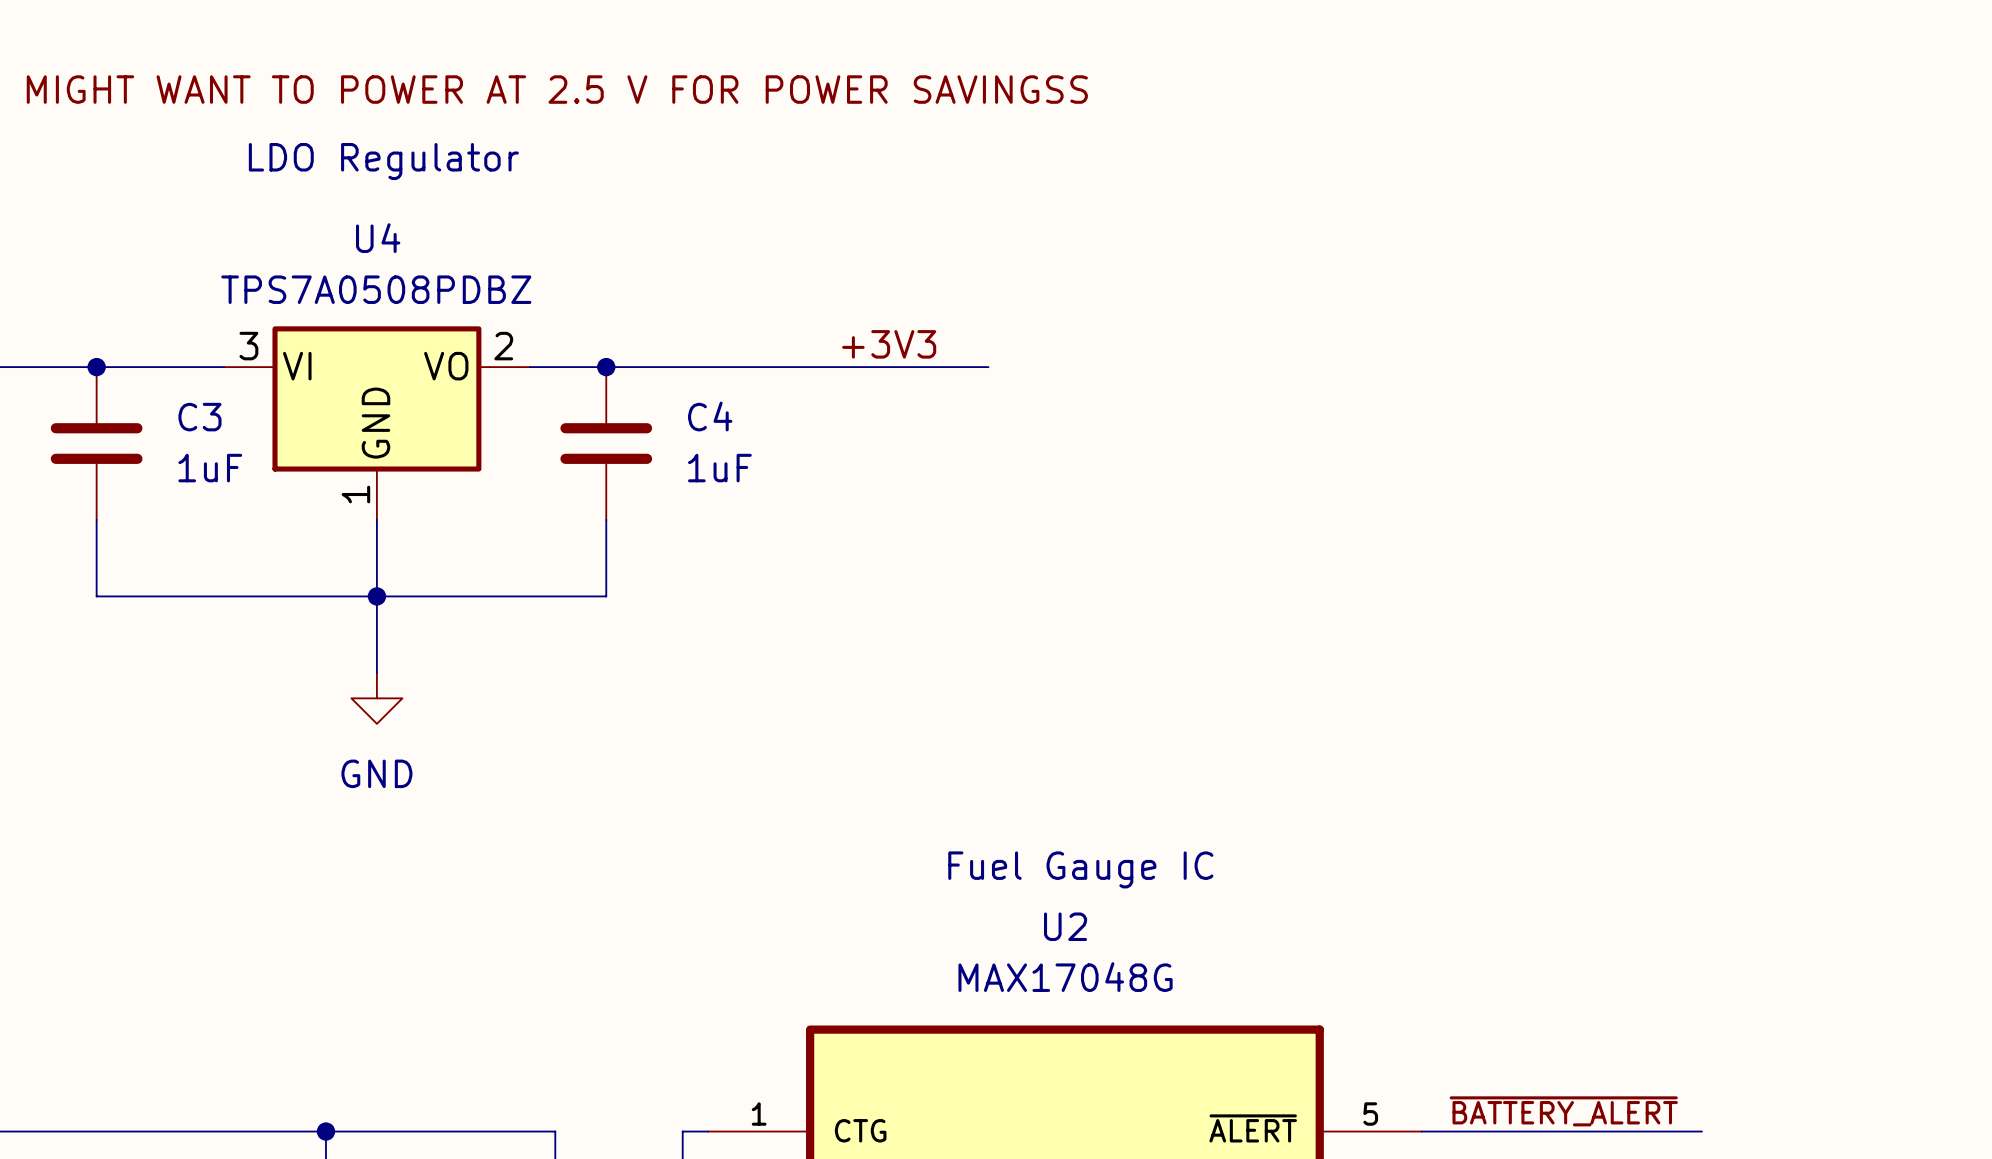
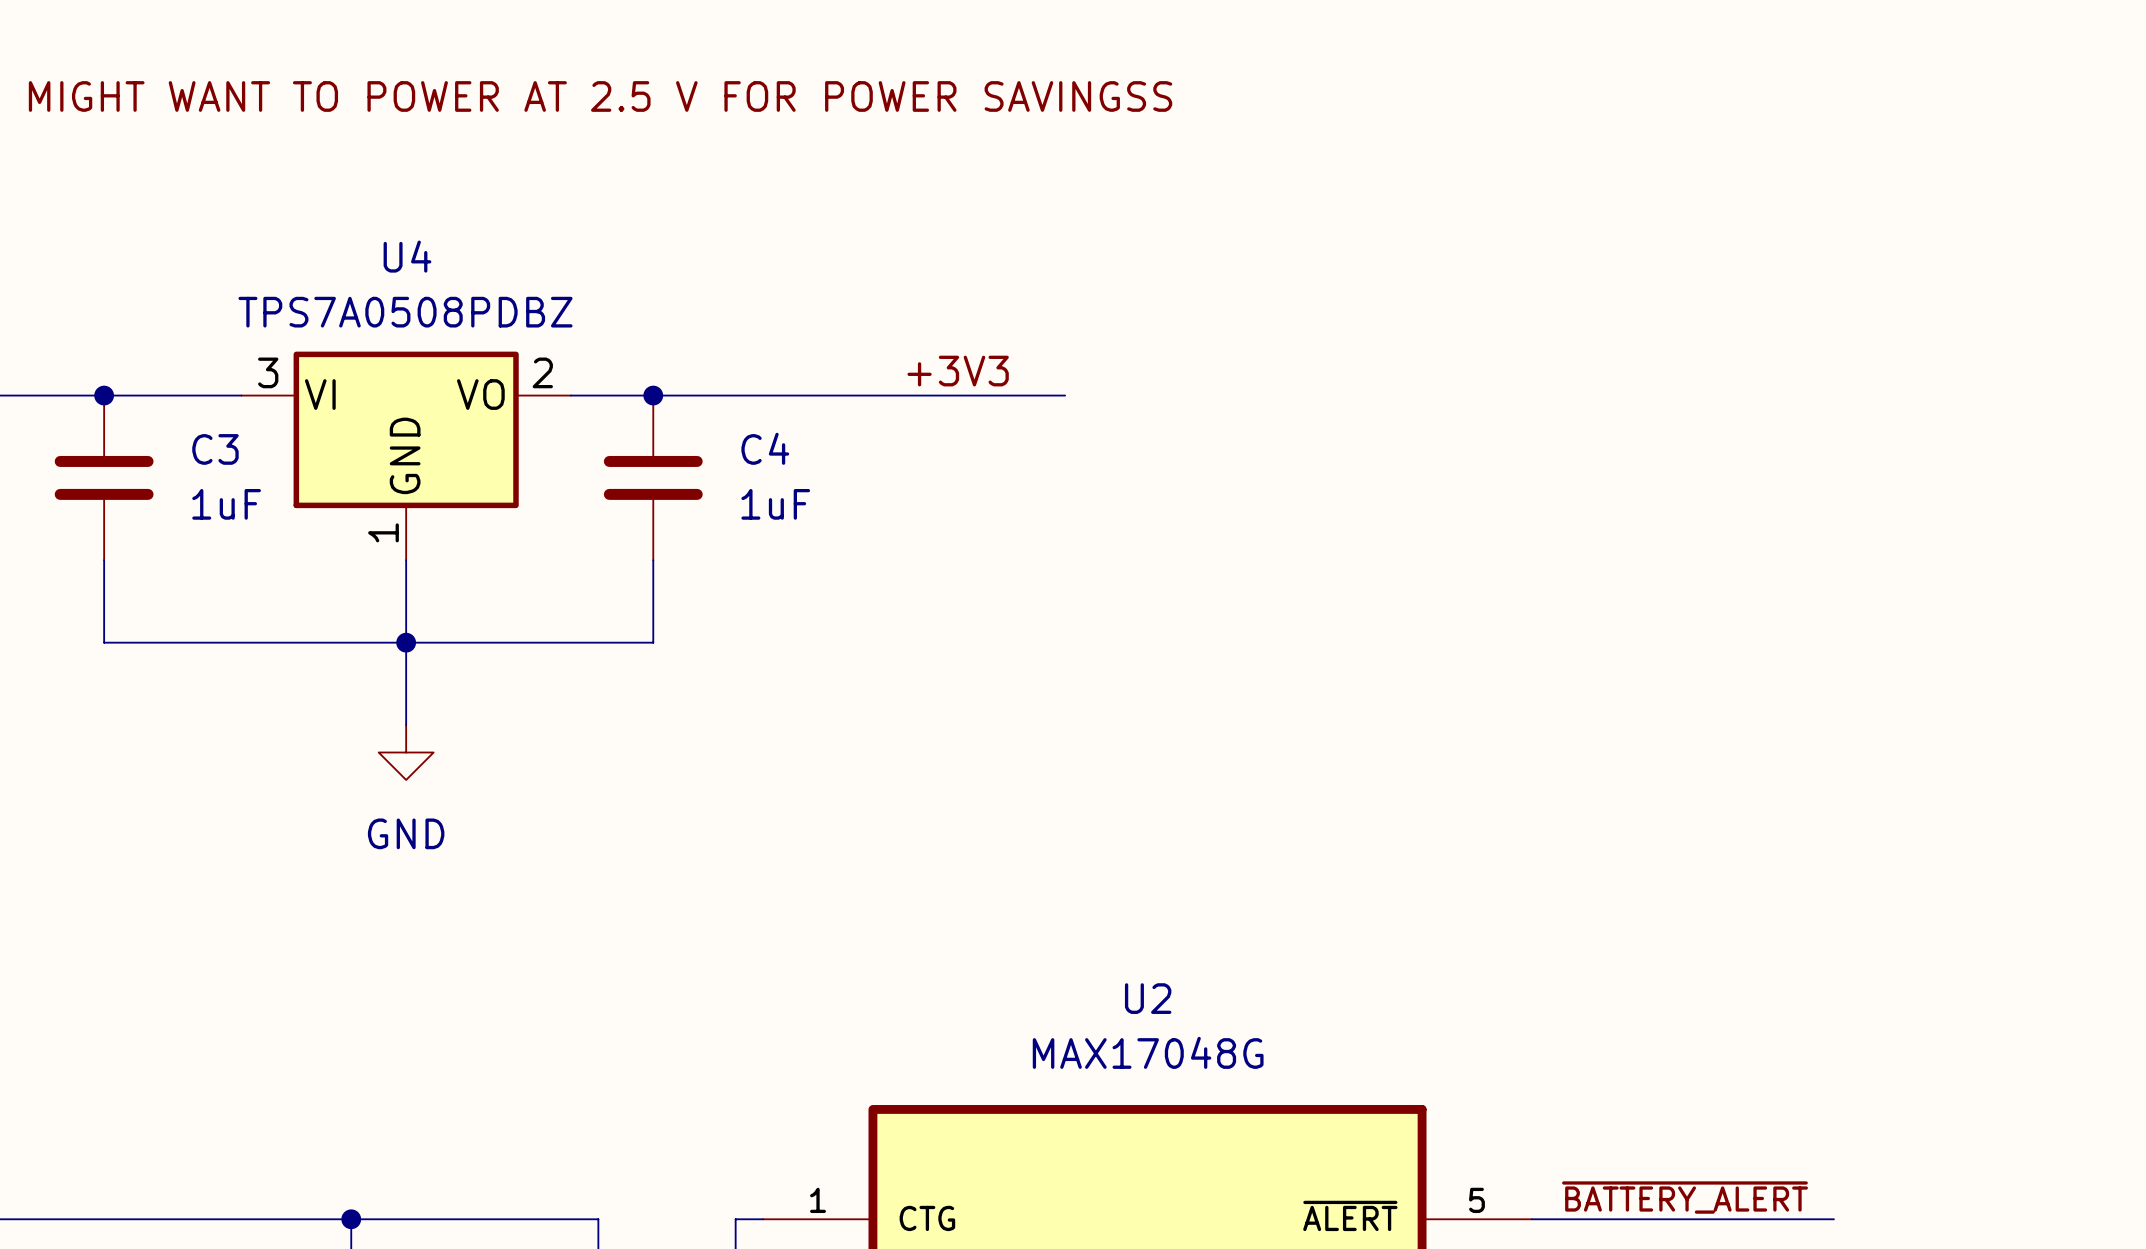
text: LDO Regulator (383, 161) -> none
text: Fuel Gauge IC (1080, 869) -> none

